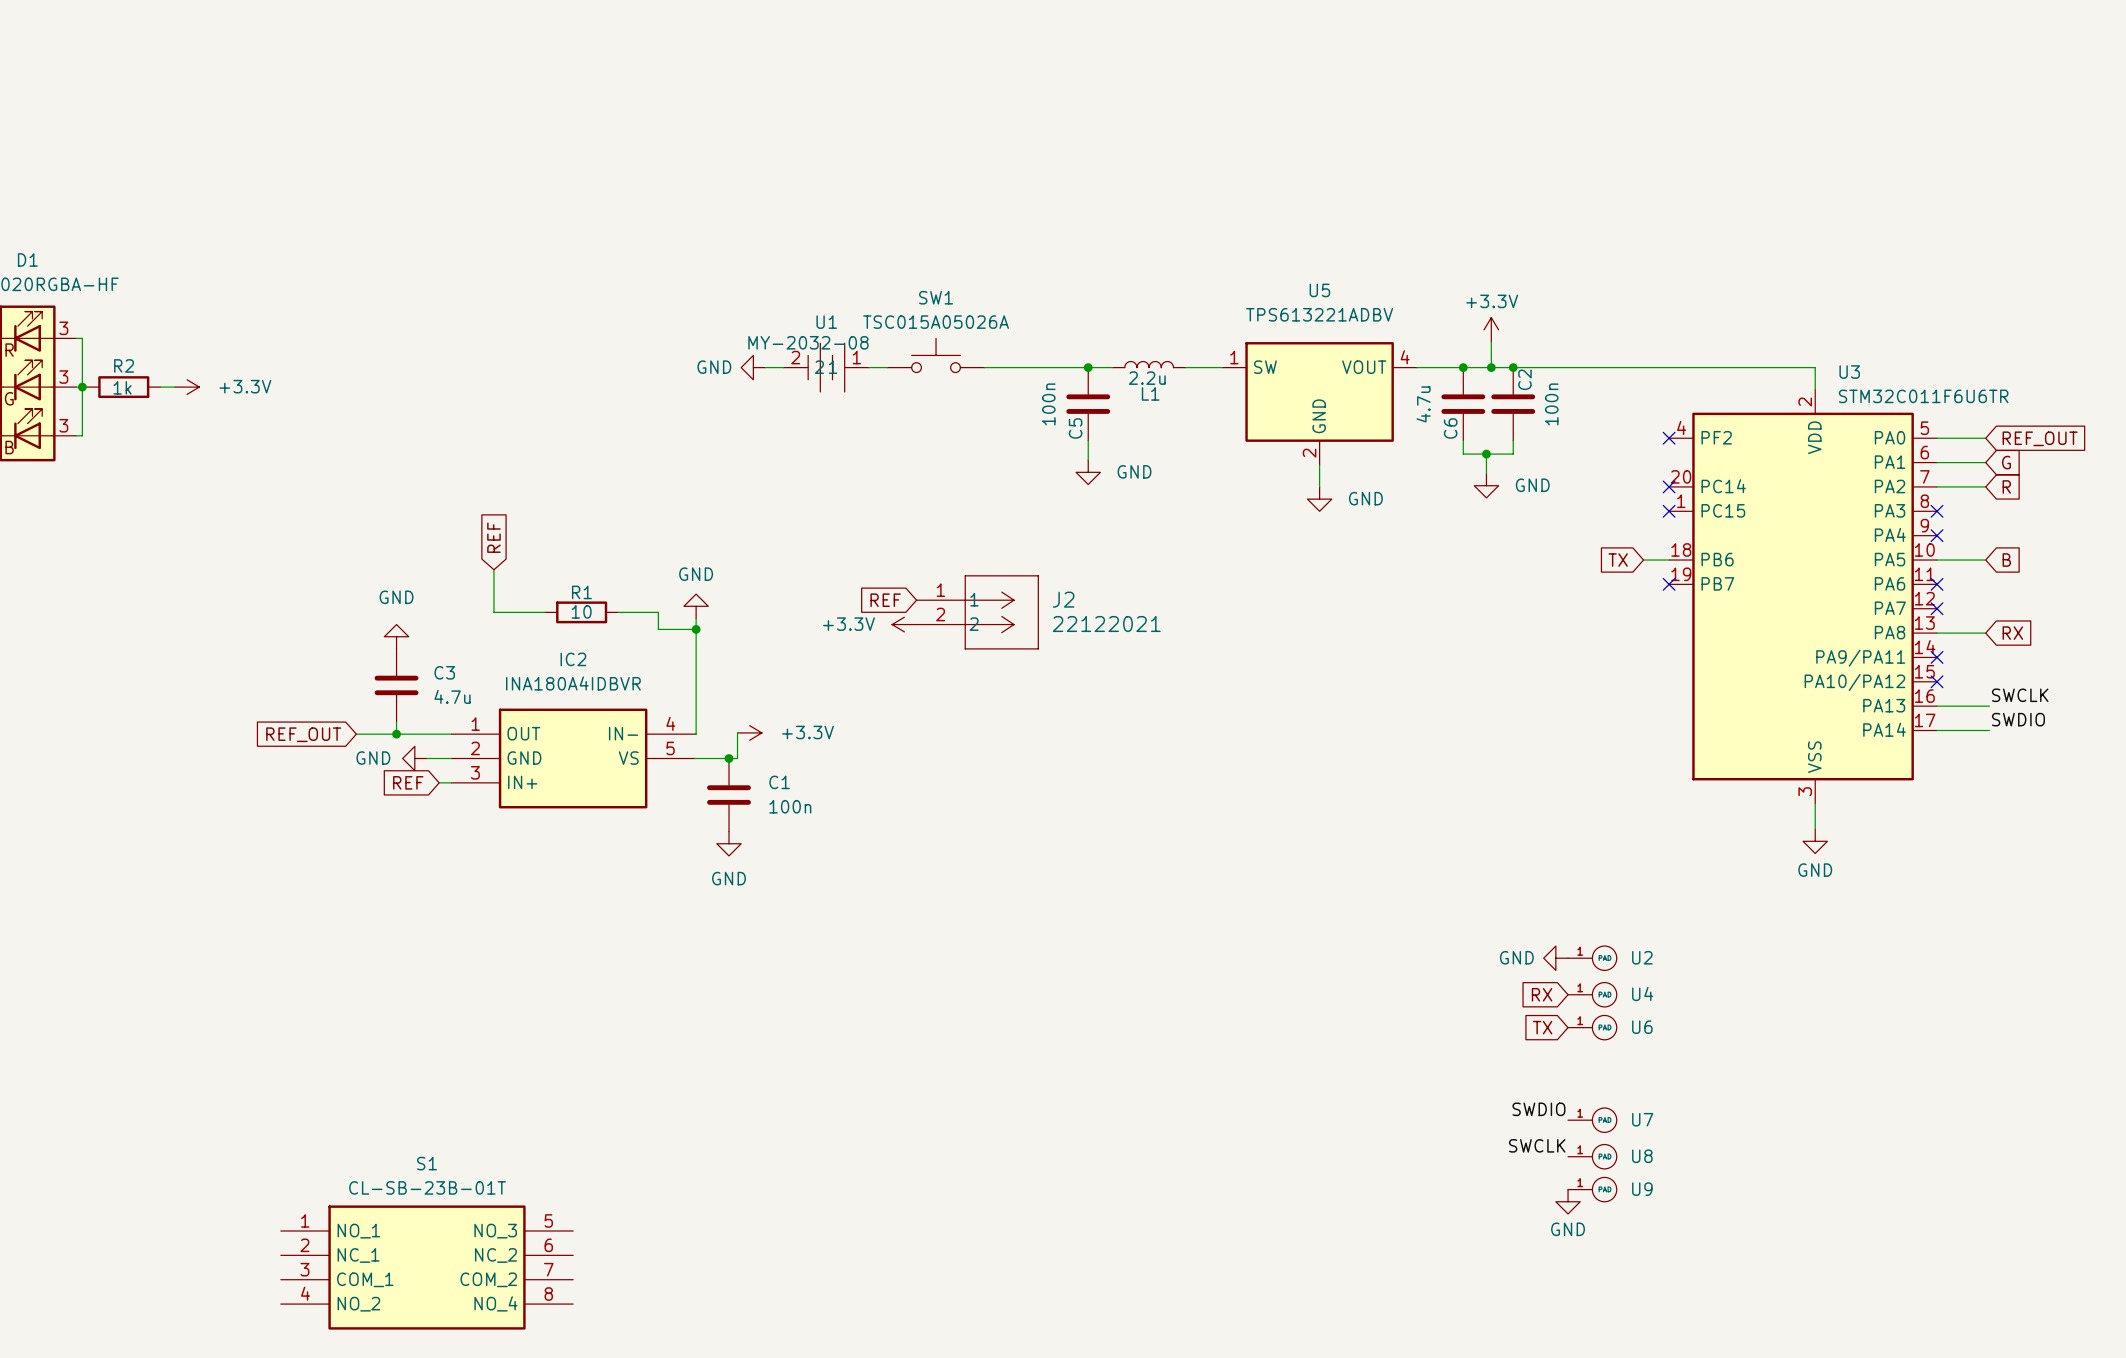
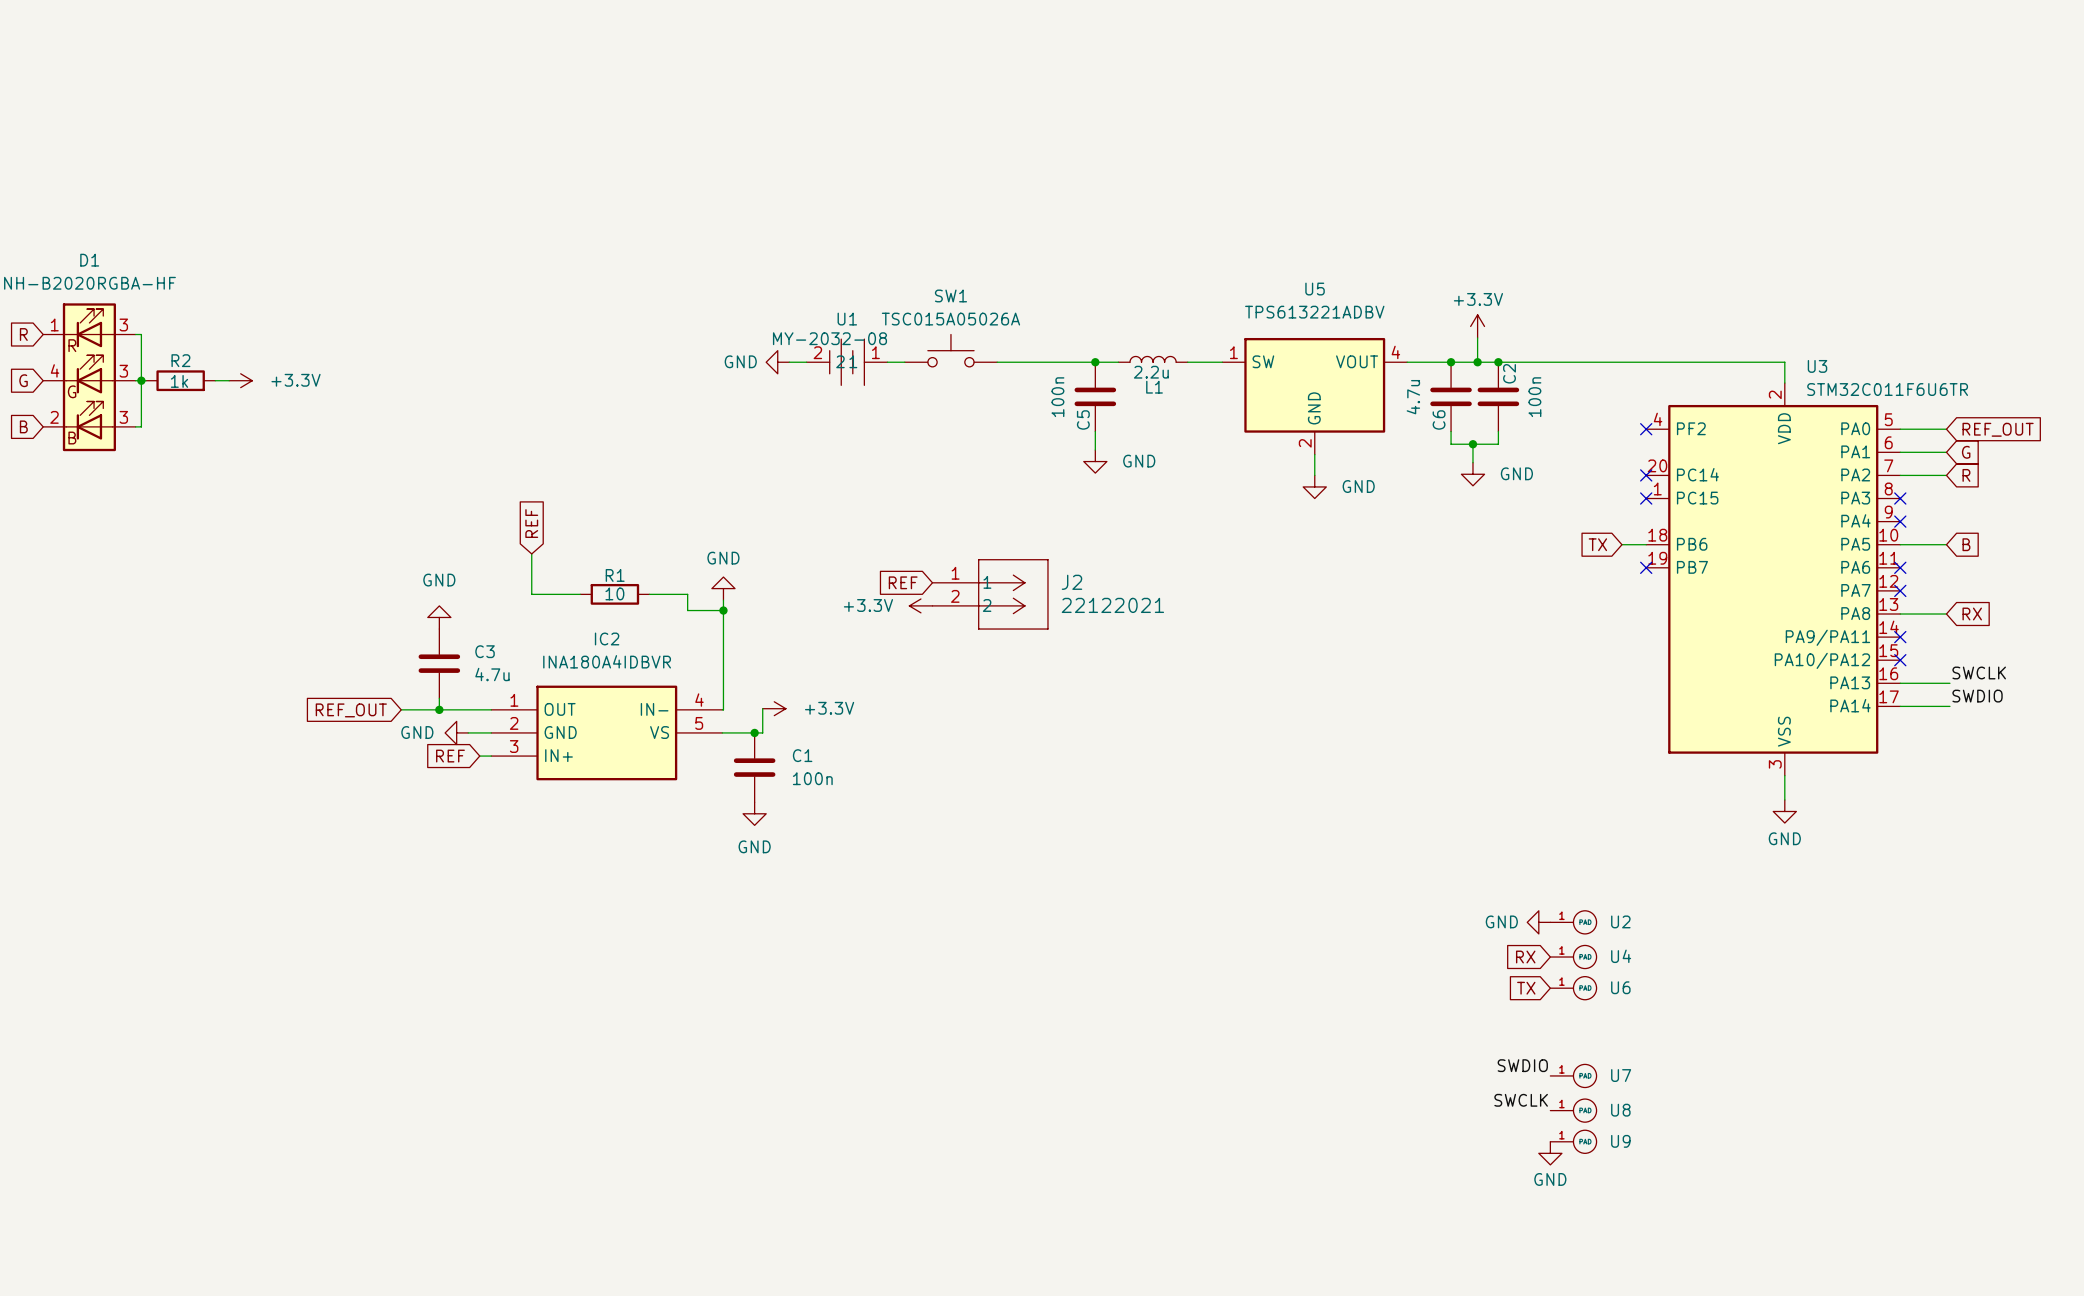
S1: CL-SB-23B-01T (426, 1267) -> none

